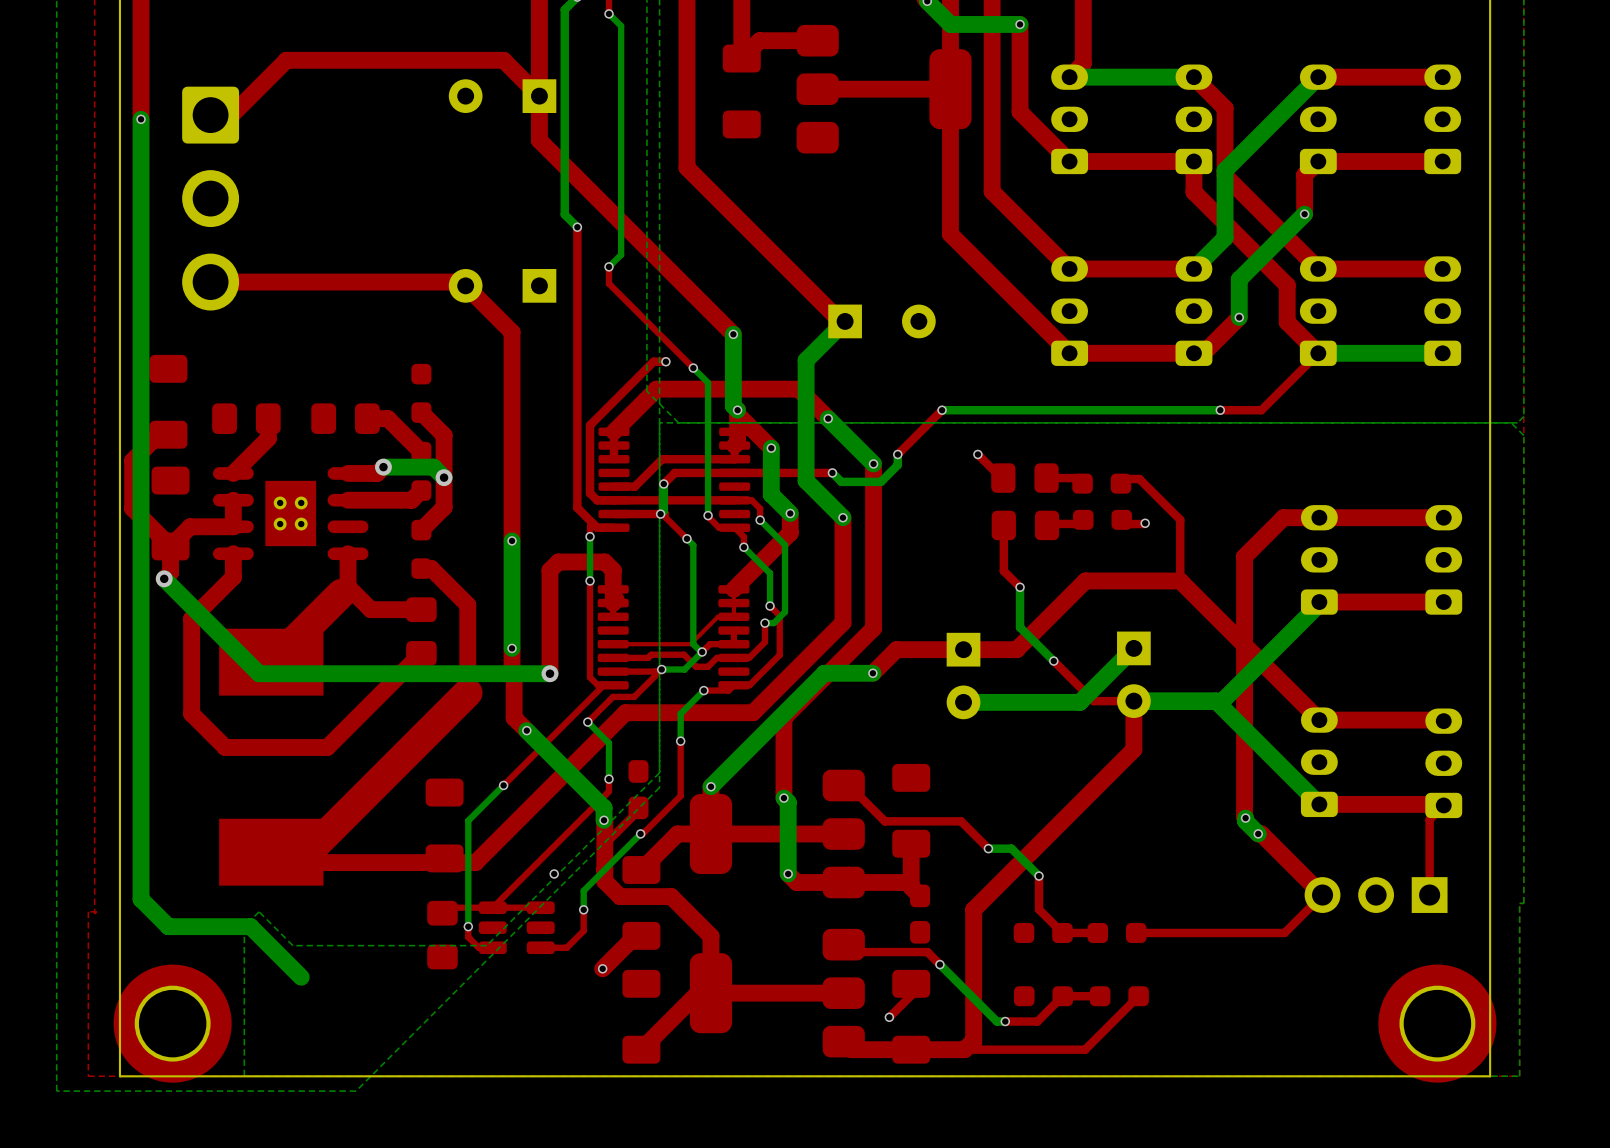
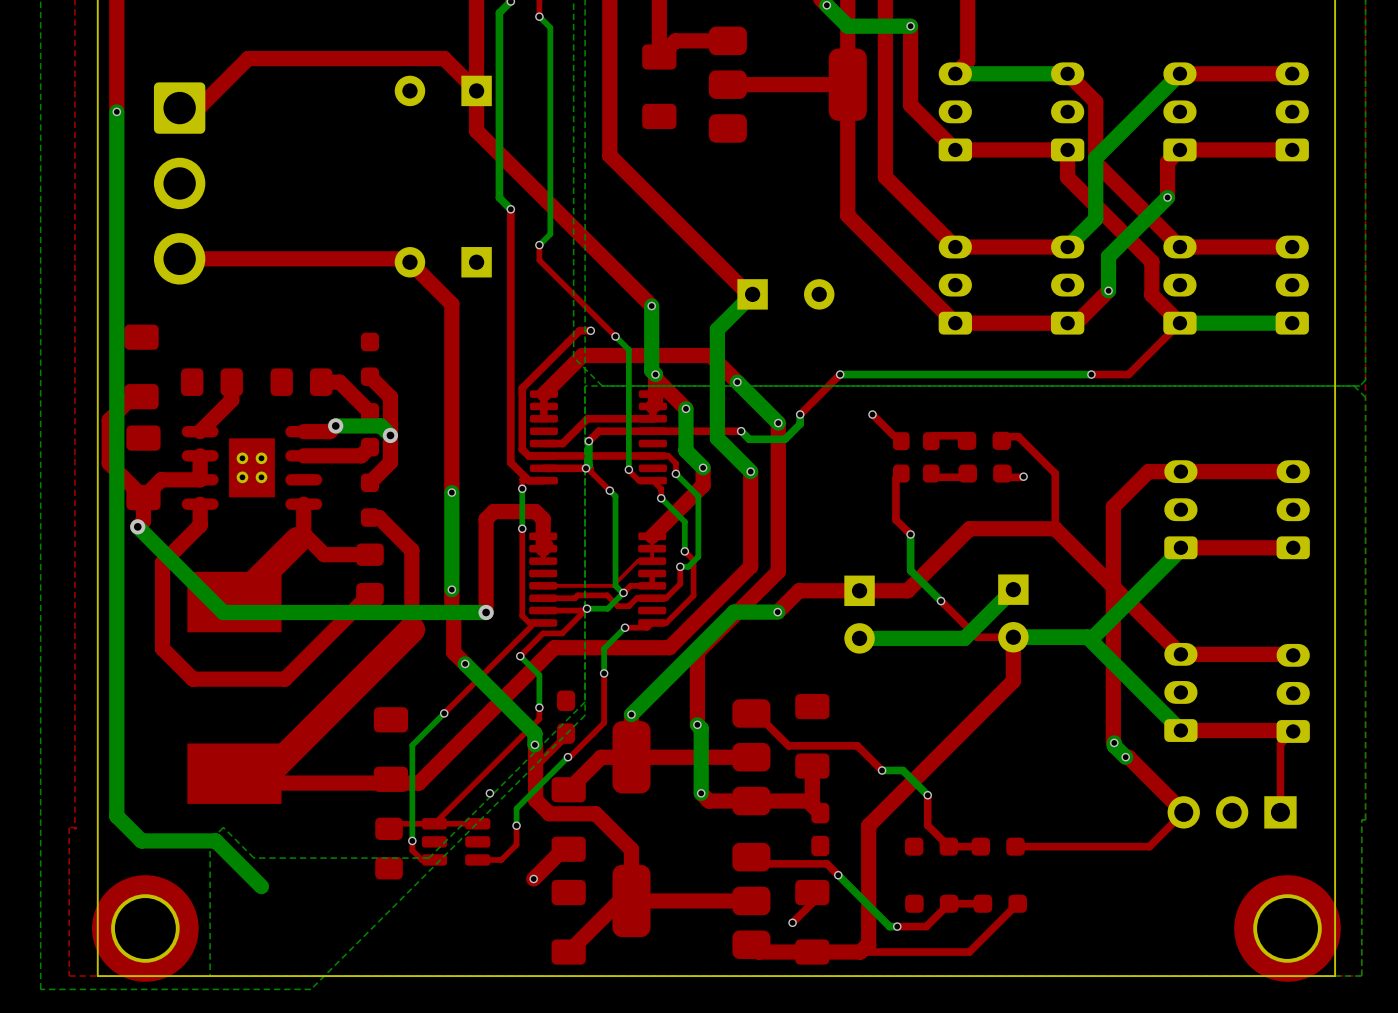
part footprint: [991, 463, 1059, 493] -> [892, 432, 940, 451]
part footprint: [991, 510, 1060, 541] -> [892, 464, 940, 483]

